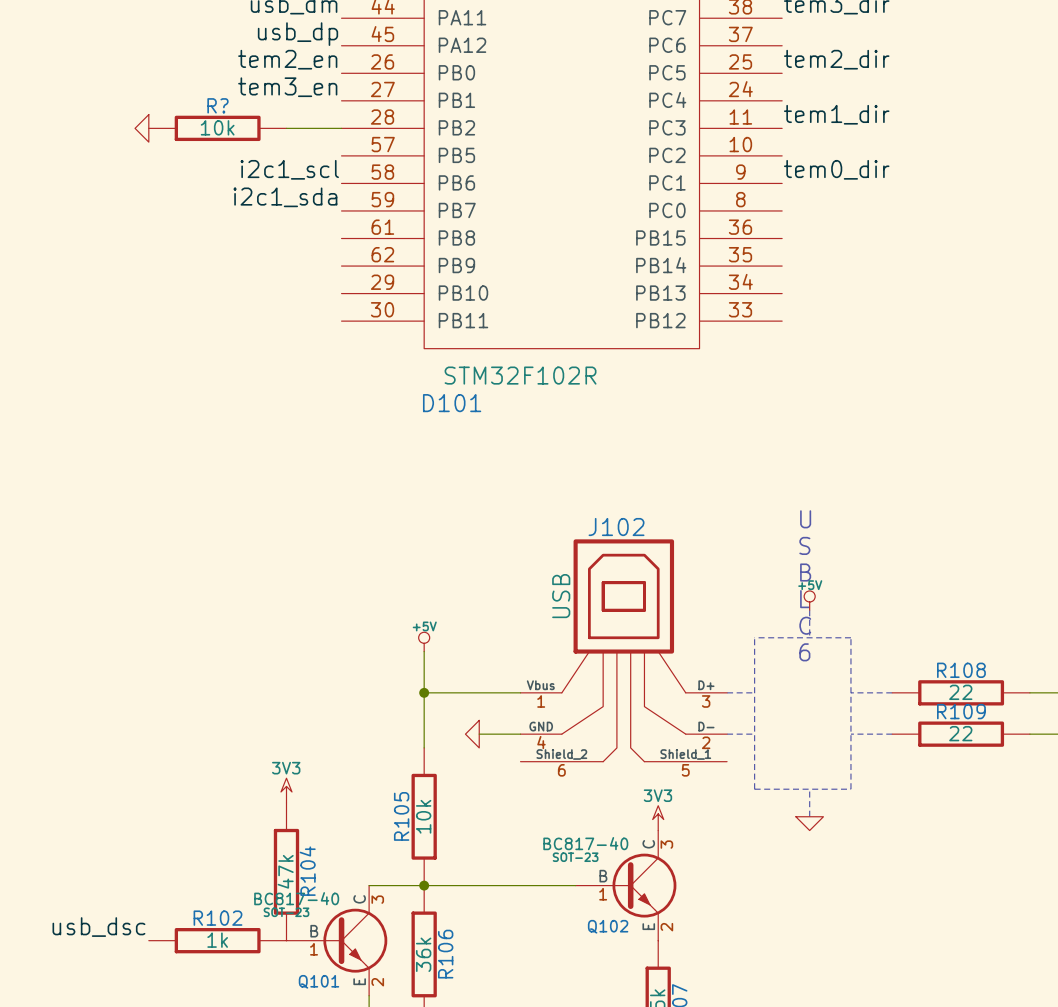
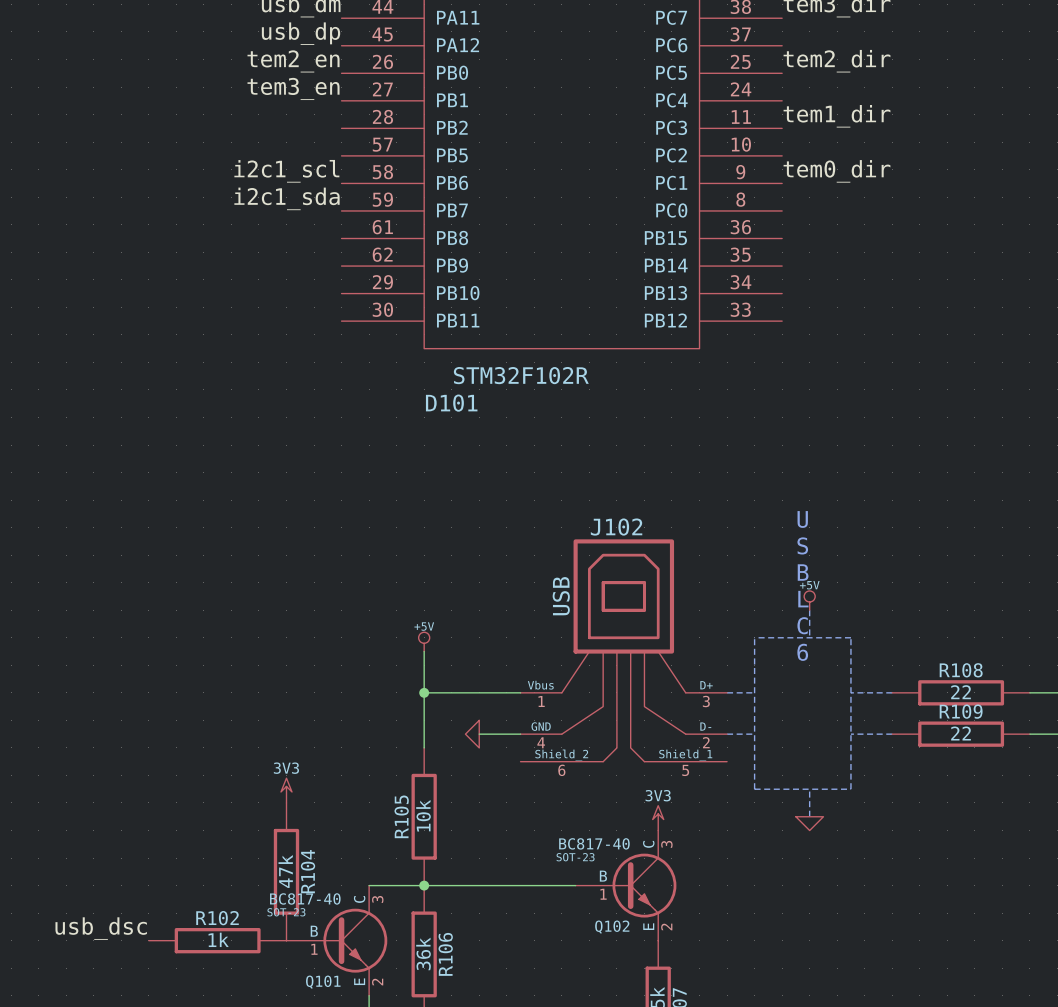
power symbol: (141, 128) -> none
R?: 10k (217, 128) -> none
wire: (286, 128) (341, 128) -> none

